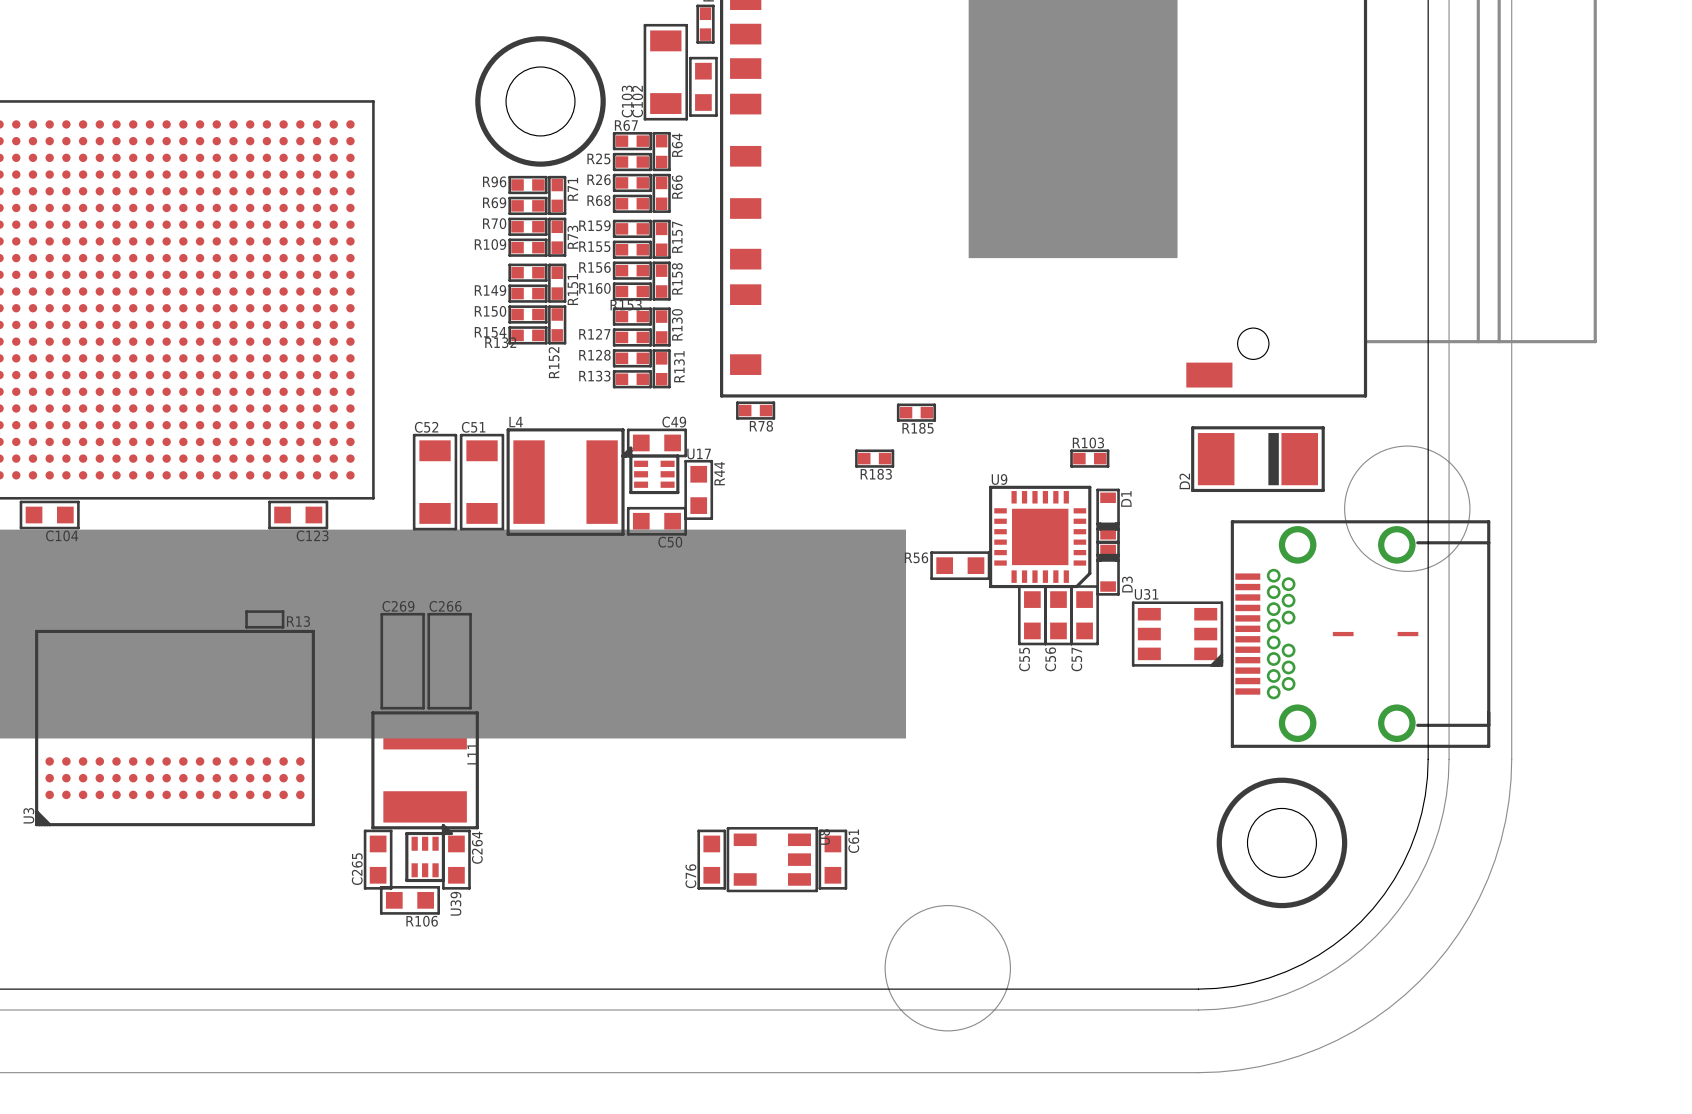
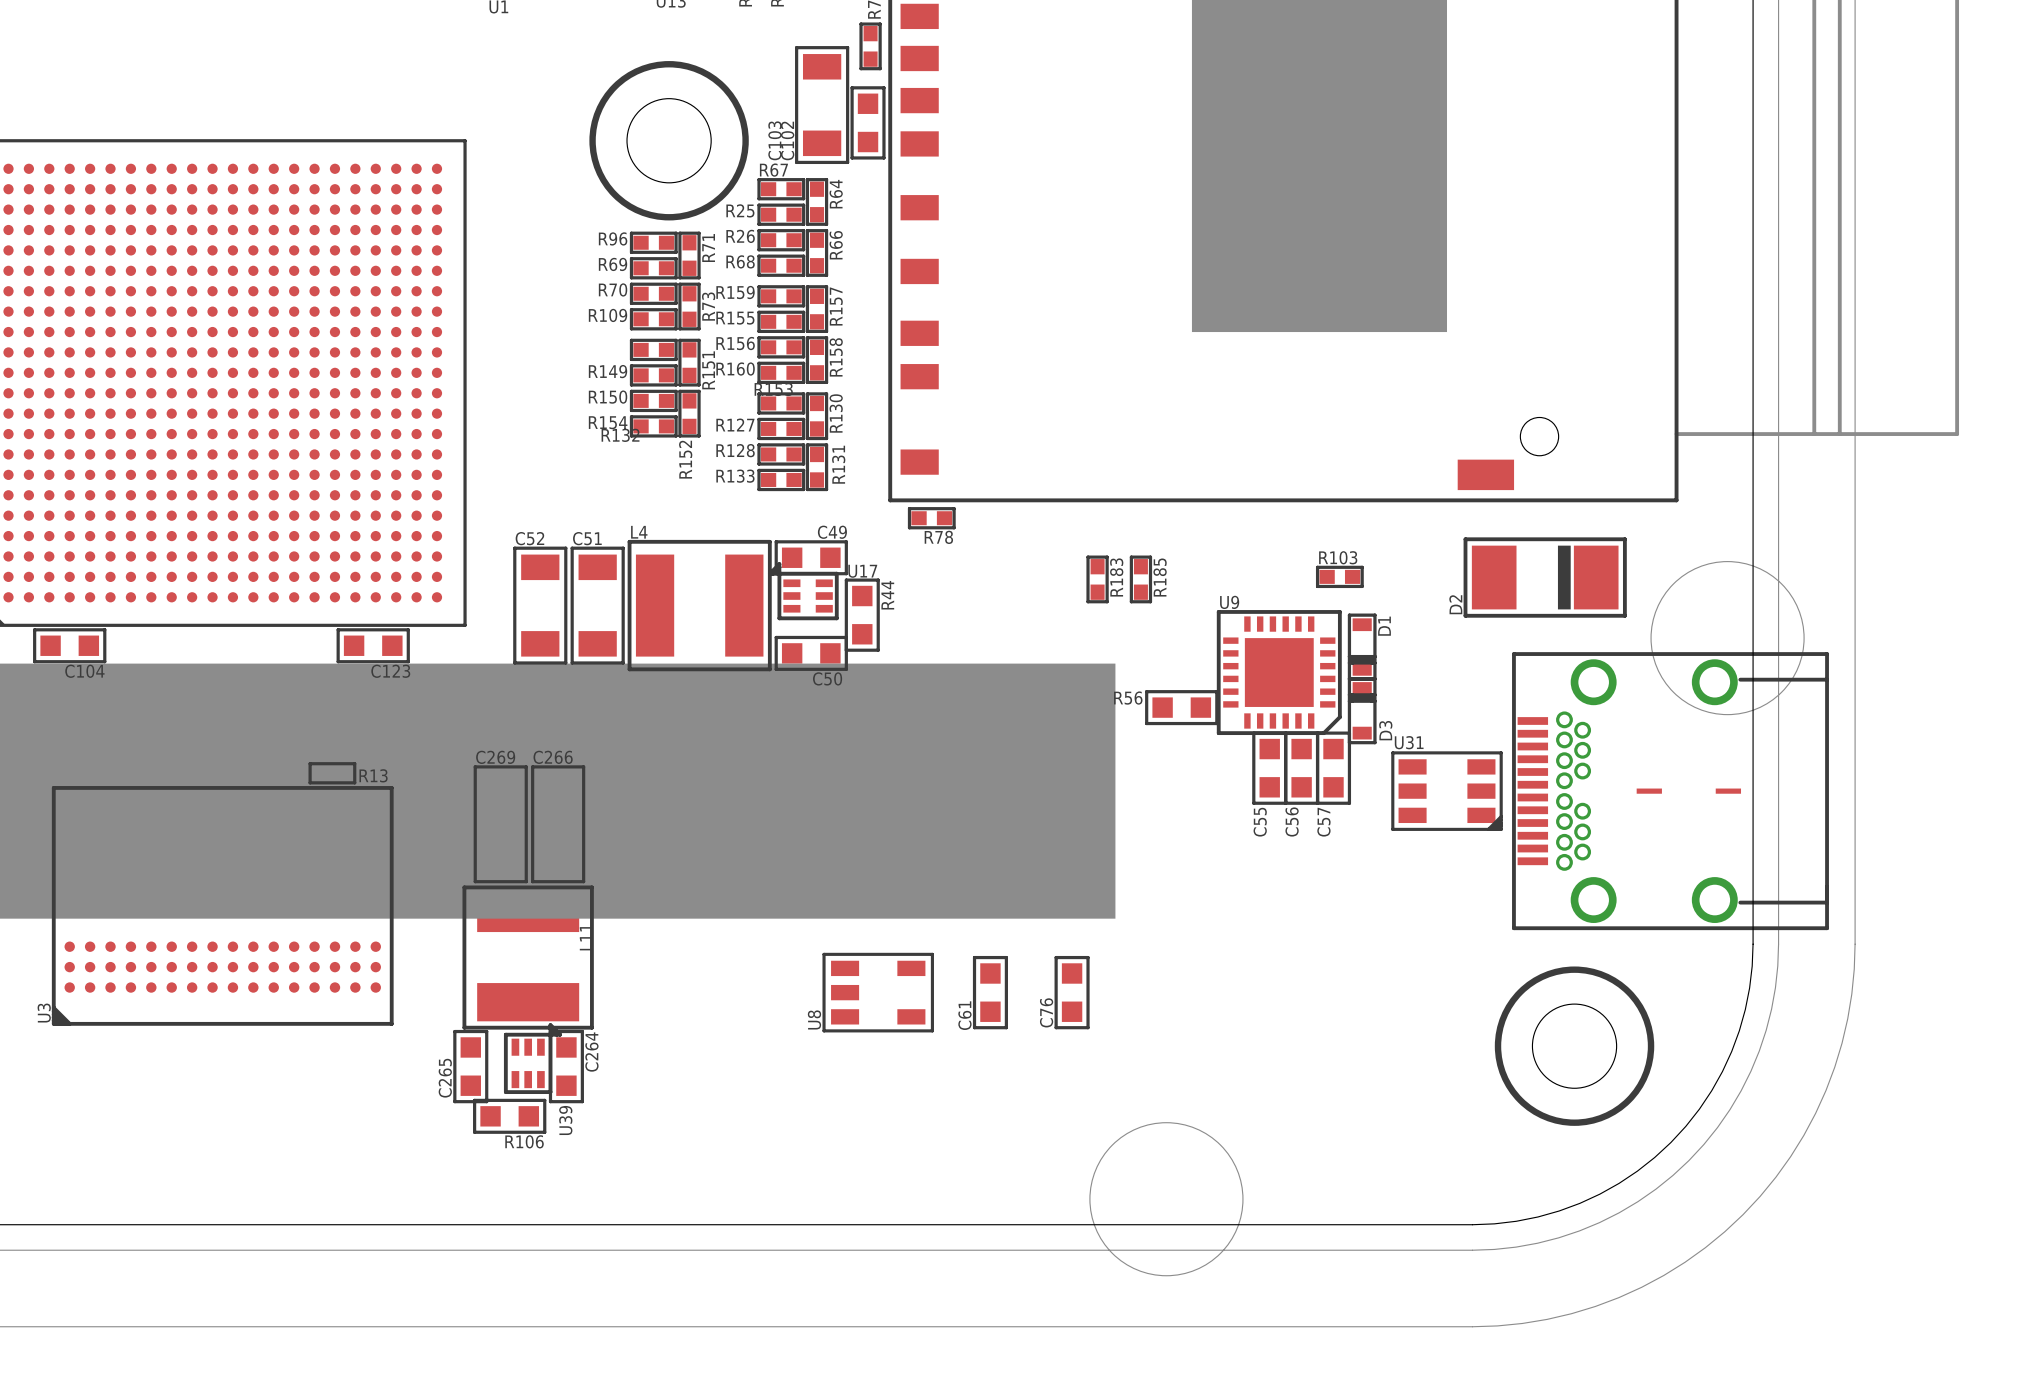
R185 rotation: 0° (916, 412) -> 90° clockwise (1140, 579)
R185 position: (916, 412) -> (1140, 579)
R183 rotation: 0° (874, 458) -> 90° clockwise (1097, 579)
C61 name position: C61 (853, 841) -> C61 (964, 1015)
C76 position: (711, 859) -> (1072, 992)
U8 rotation: 0° (772, 859) -> 180° (878, 992)
U8 position: (772, 859) -> (878, 992)
C61 position: (832, 859) -> (990, 992)

